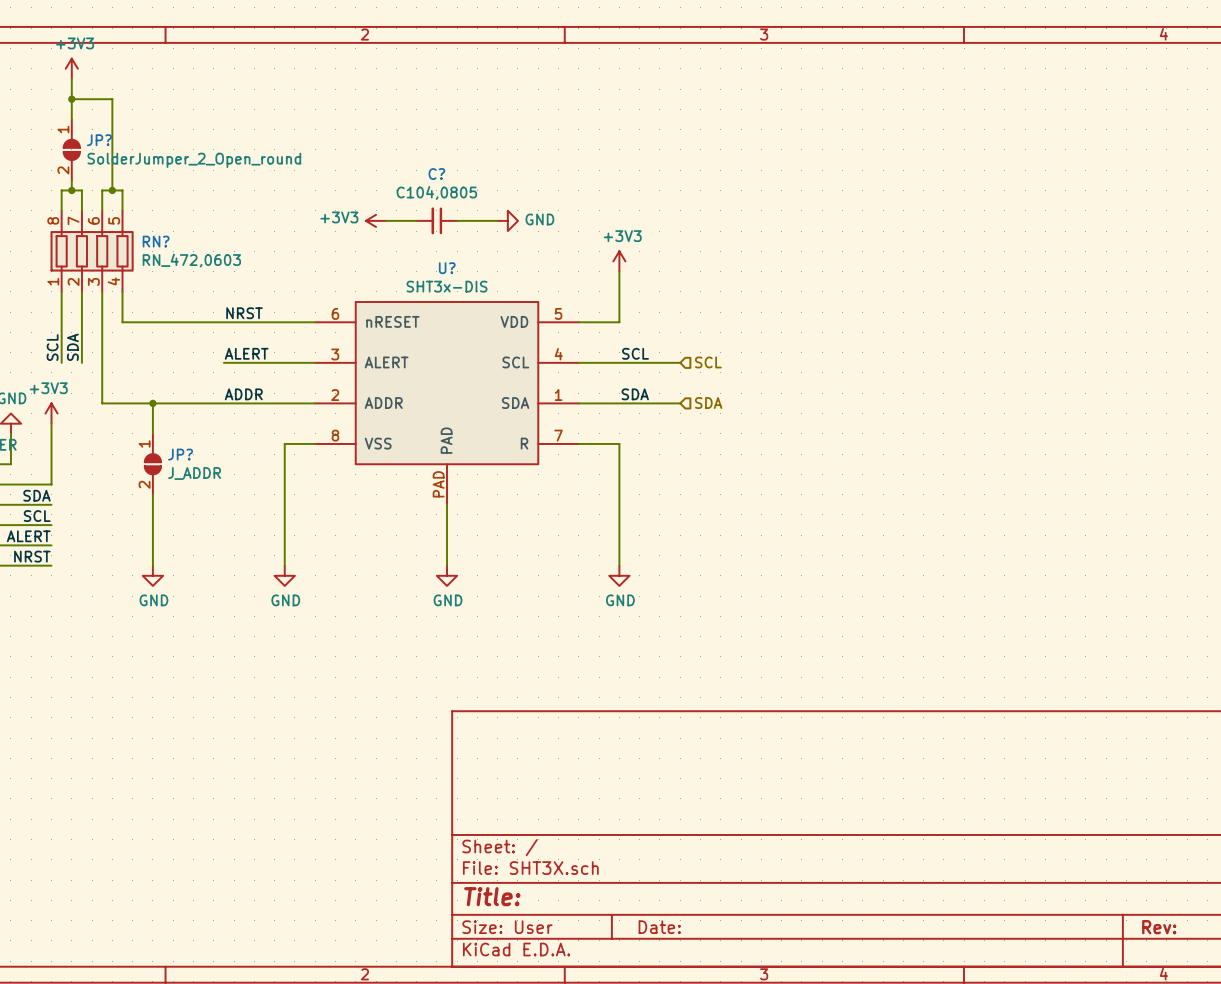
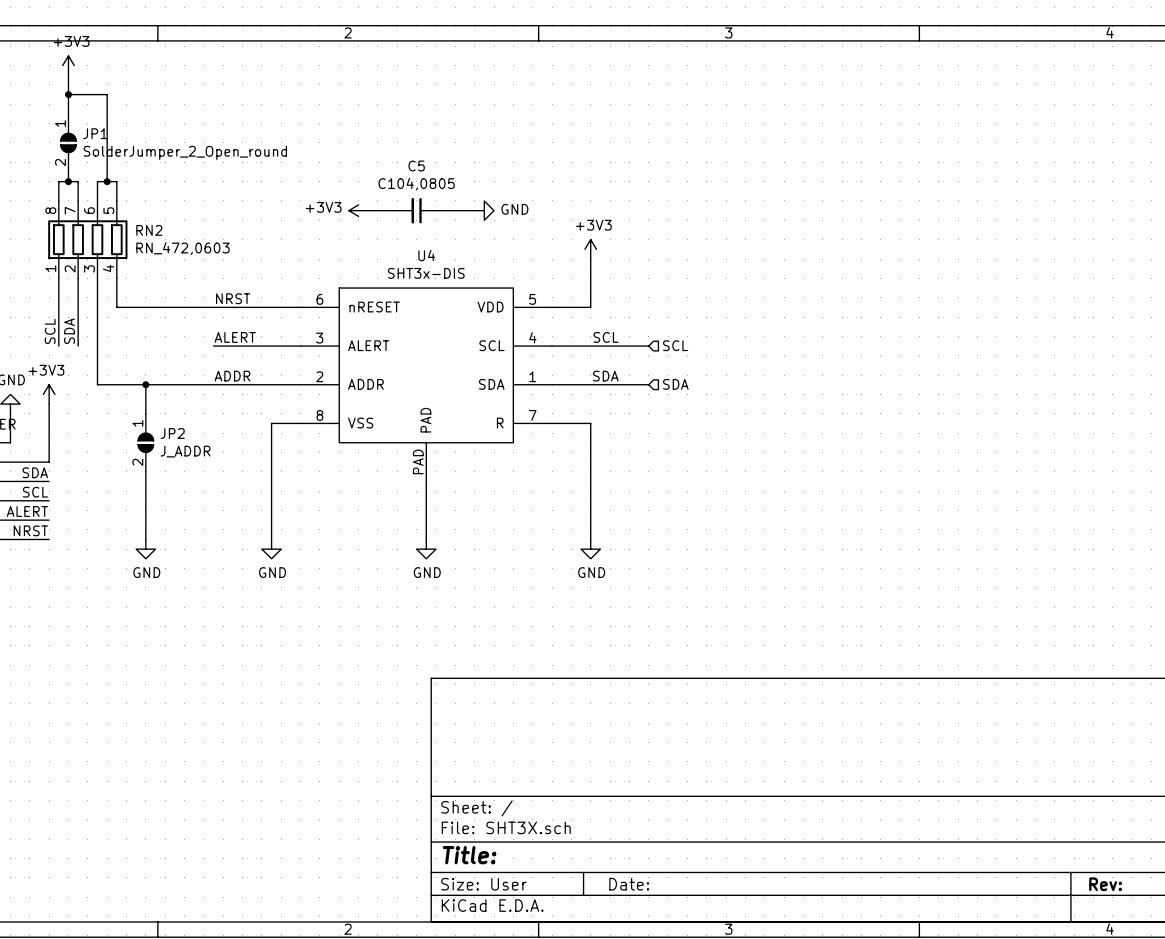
JP? name: JP? (99, 140) -> JP1 (95, 133)
C? name: C? (436, 174) -> C5 (416, 166)
RN? name: RN? (156, 241) -> RN2 (149, 230)
U? name: U? (447, 268) -> U4 (426, 255)
JP? name: JP? (180, 454) -> JP2 (172, 433)

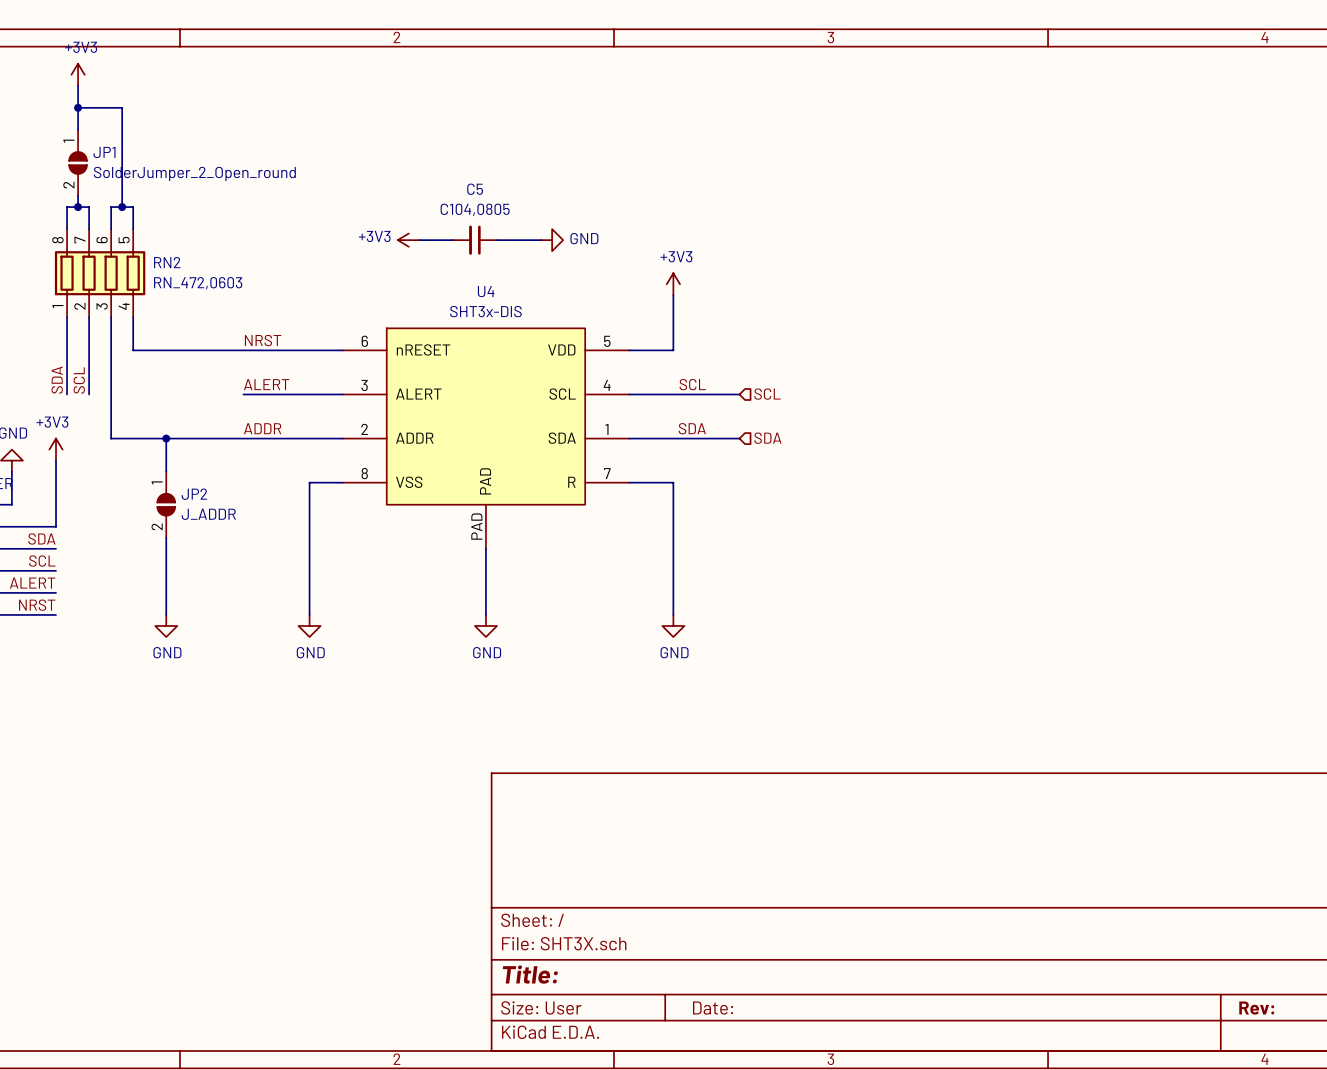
label: SCL (50, 331) -> SDA (57, 380)
label: SDA (69, 331) -> SCL (79, 380)

